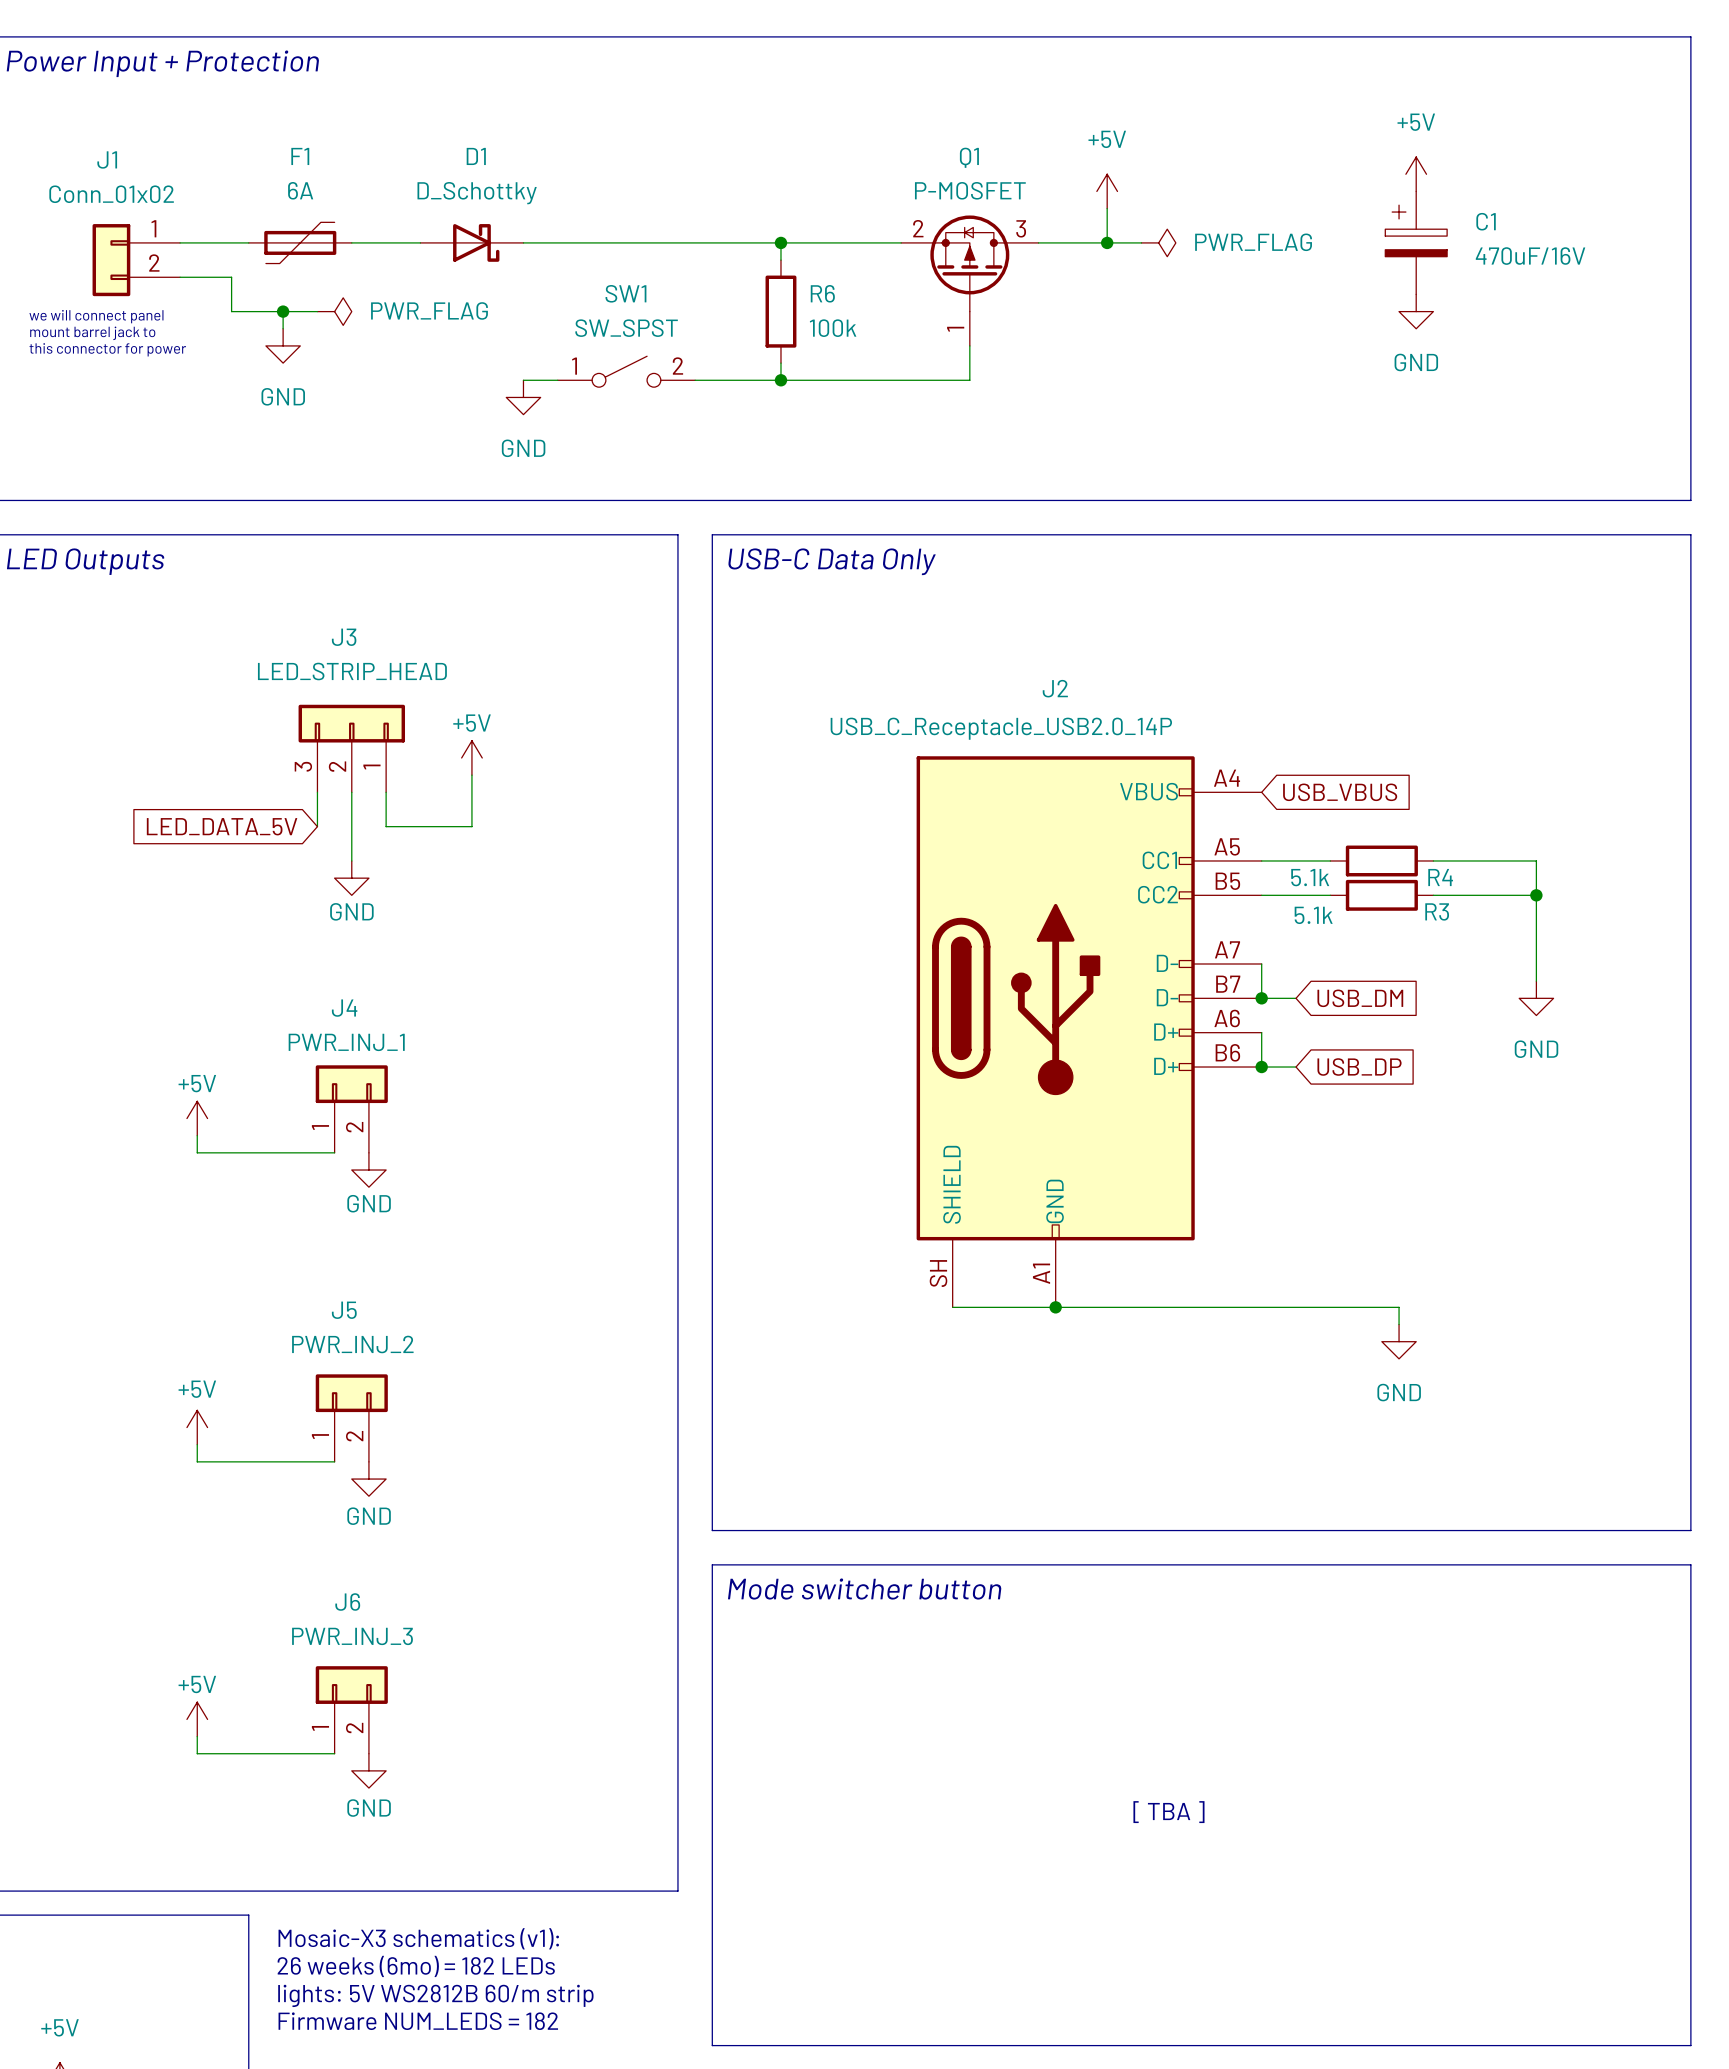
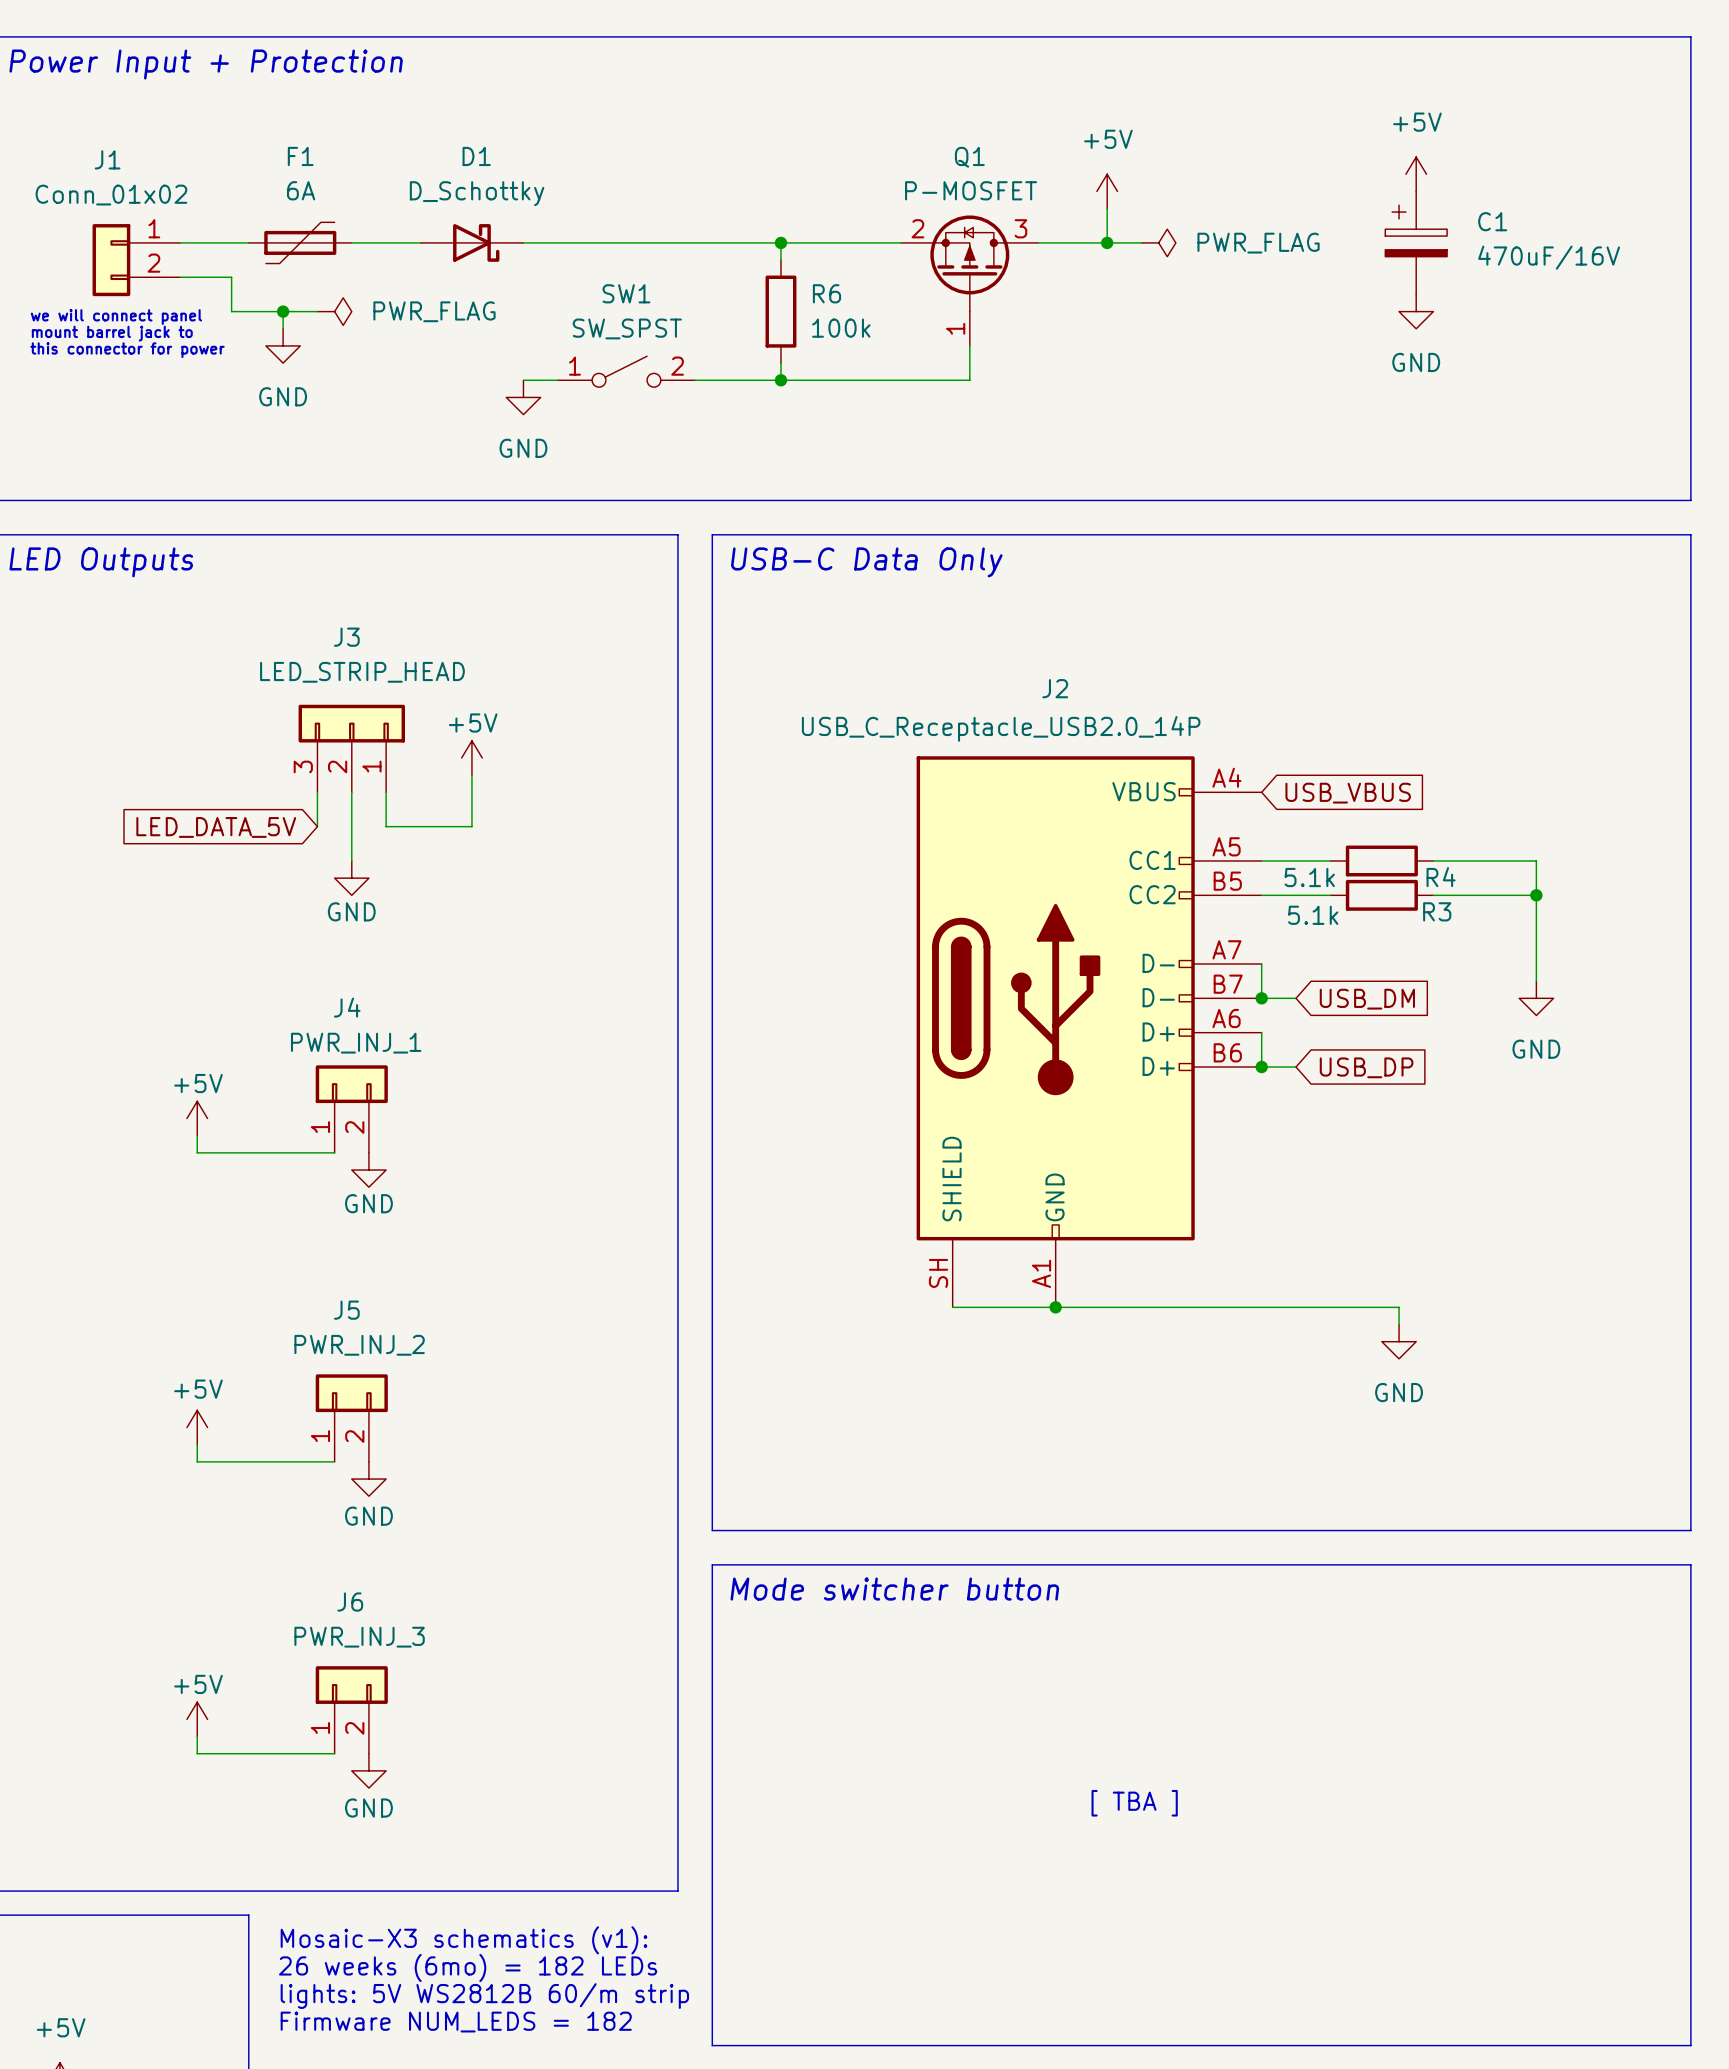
text position: [ TBA ] (1168, 1812) -> [ TBA ] (1134, 1803)

